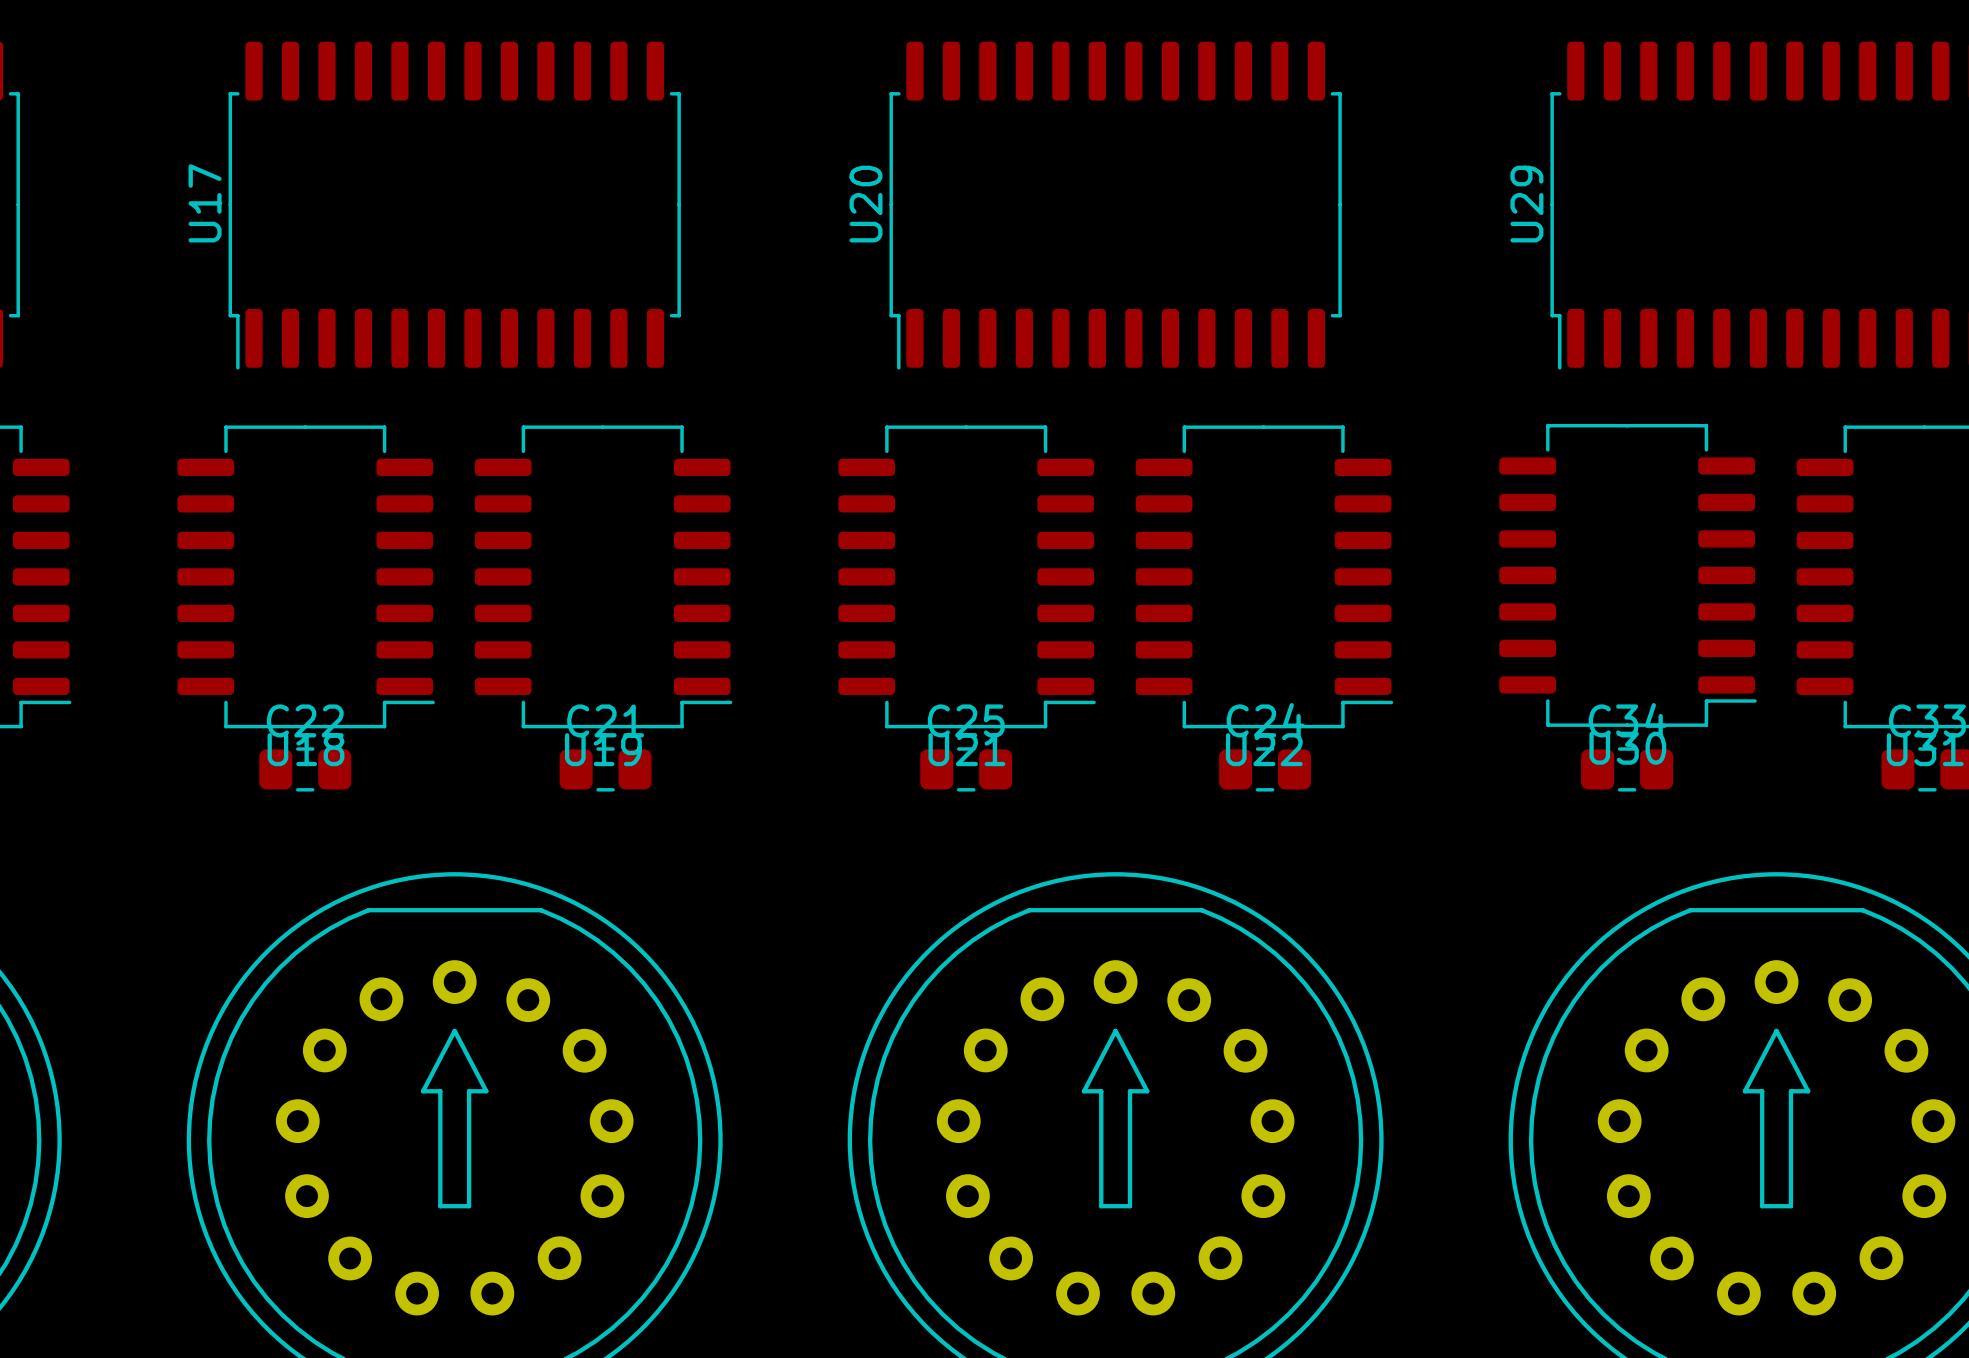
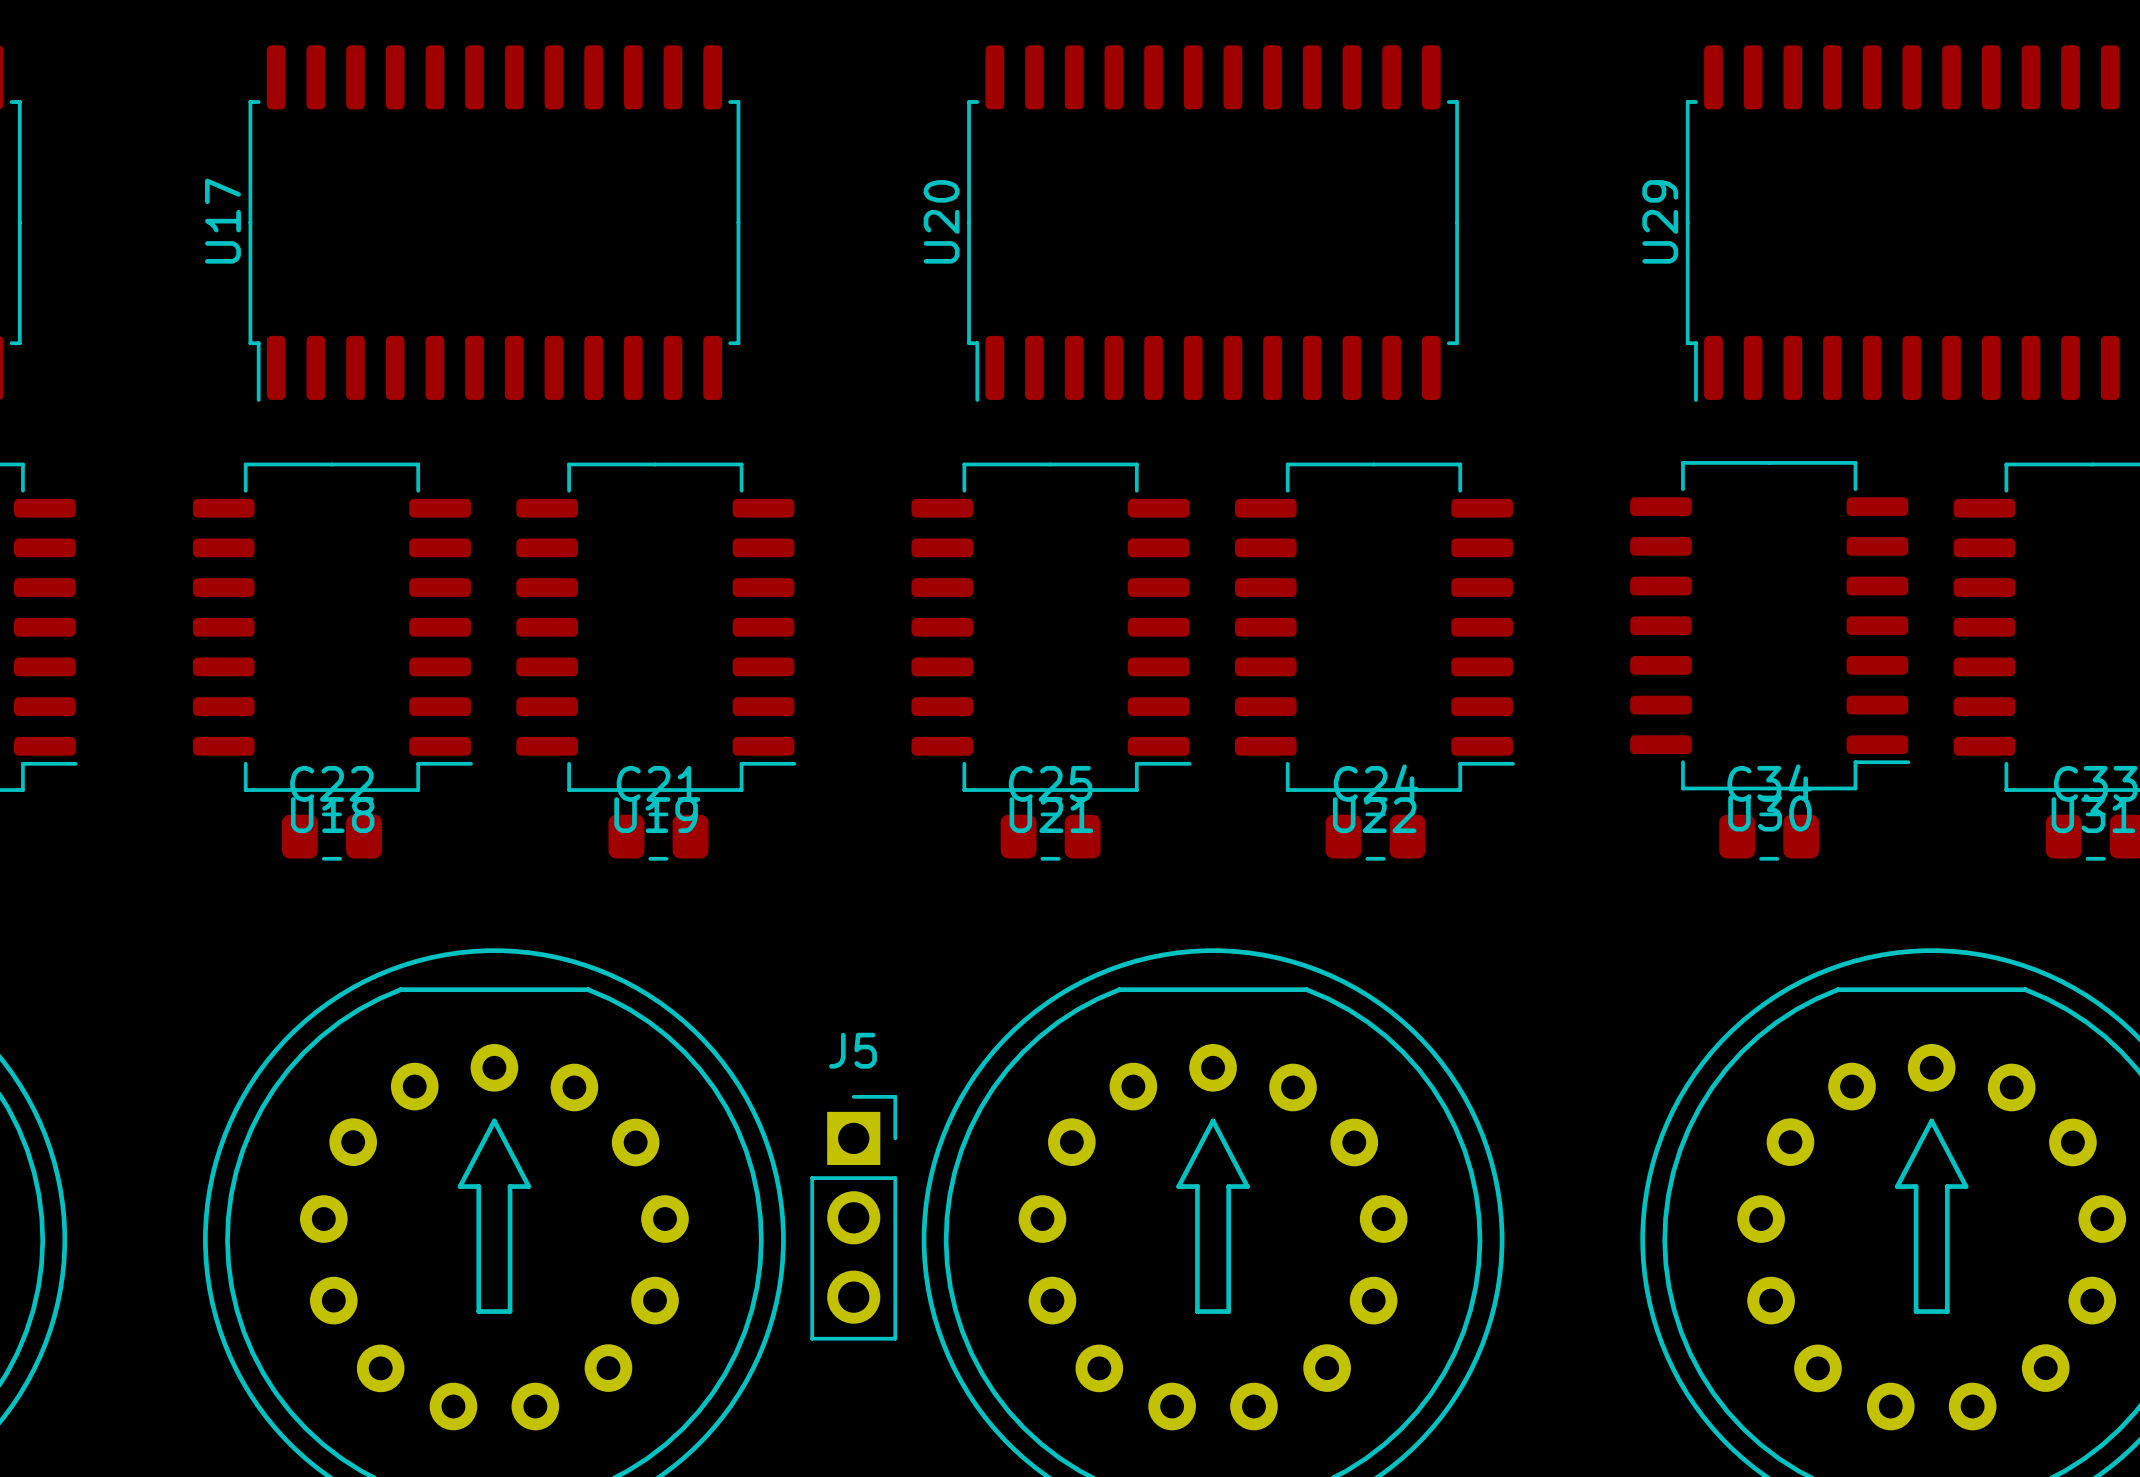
J5: none -> (853, 1217)

